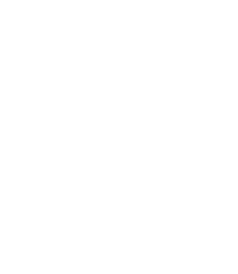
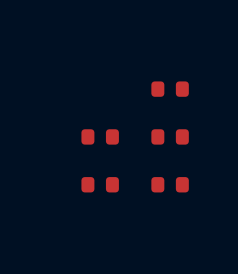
part: none -> (170, 89)
part: none -> (100, 136)
part: none -> (170, 136)
part: none -> (100, 184)
part: none -> (170, 184)

